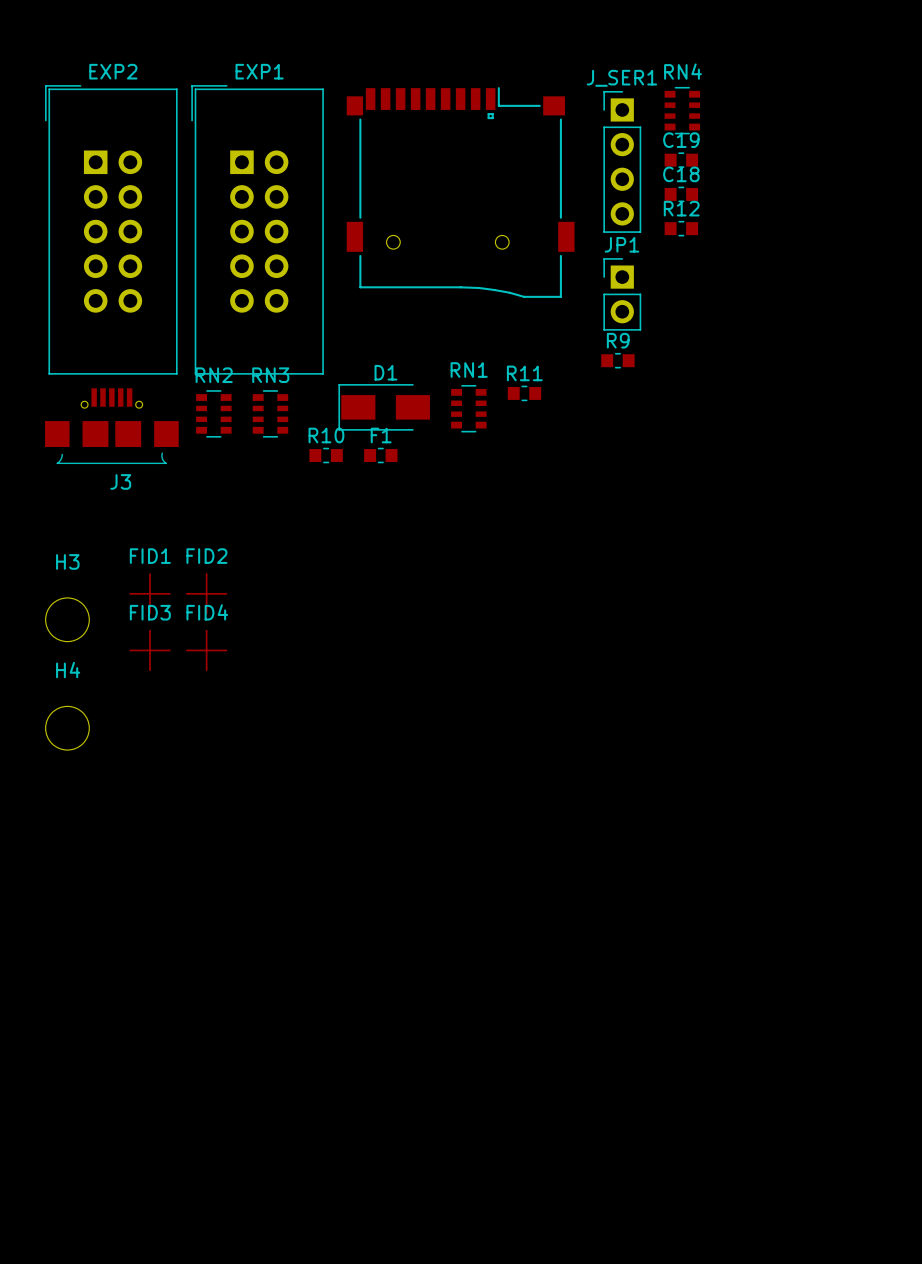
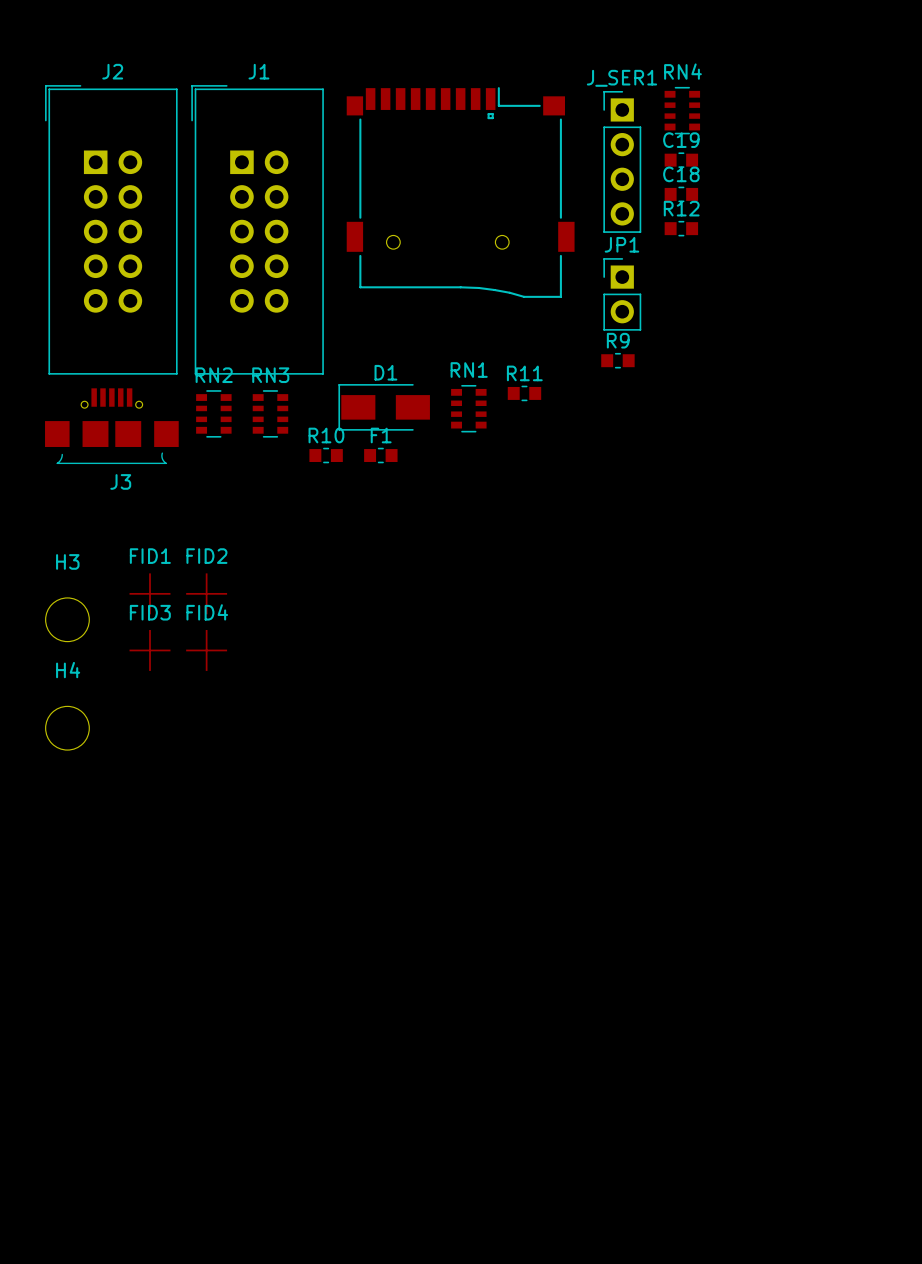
EXP2 name: EXP2 (113, 71) -> J2 (112, 71)
EXP1 name: EXP1 (259, 71) -> J1 (258, 71)

